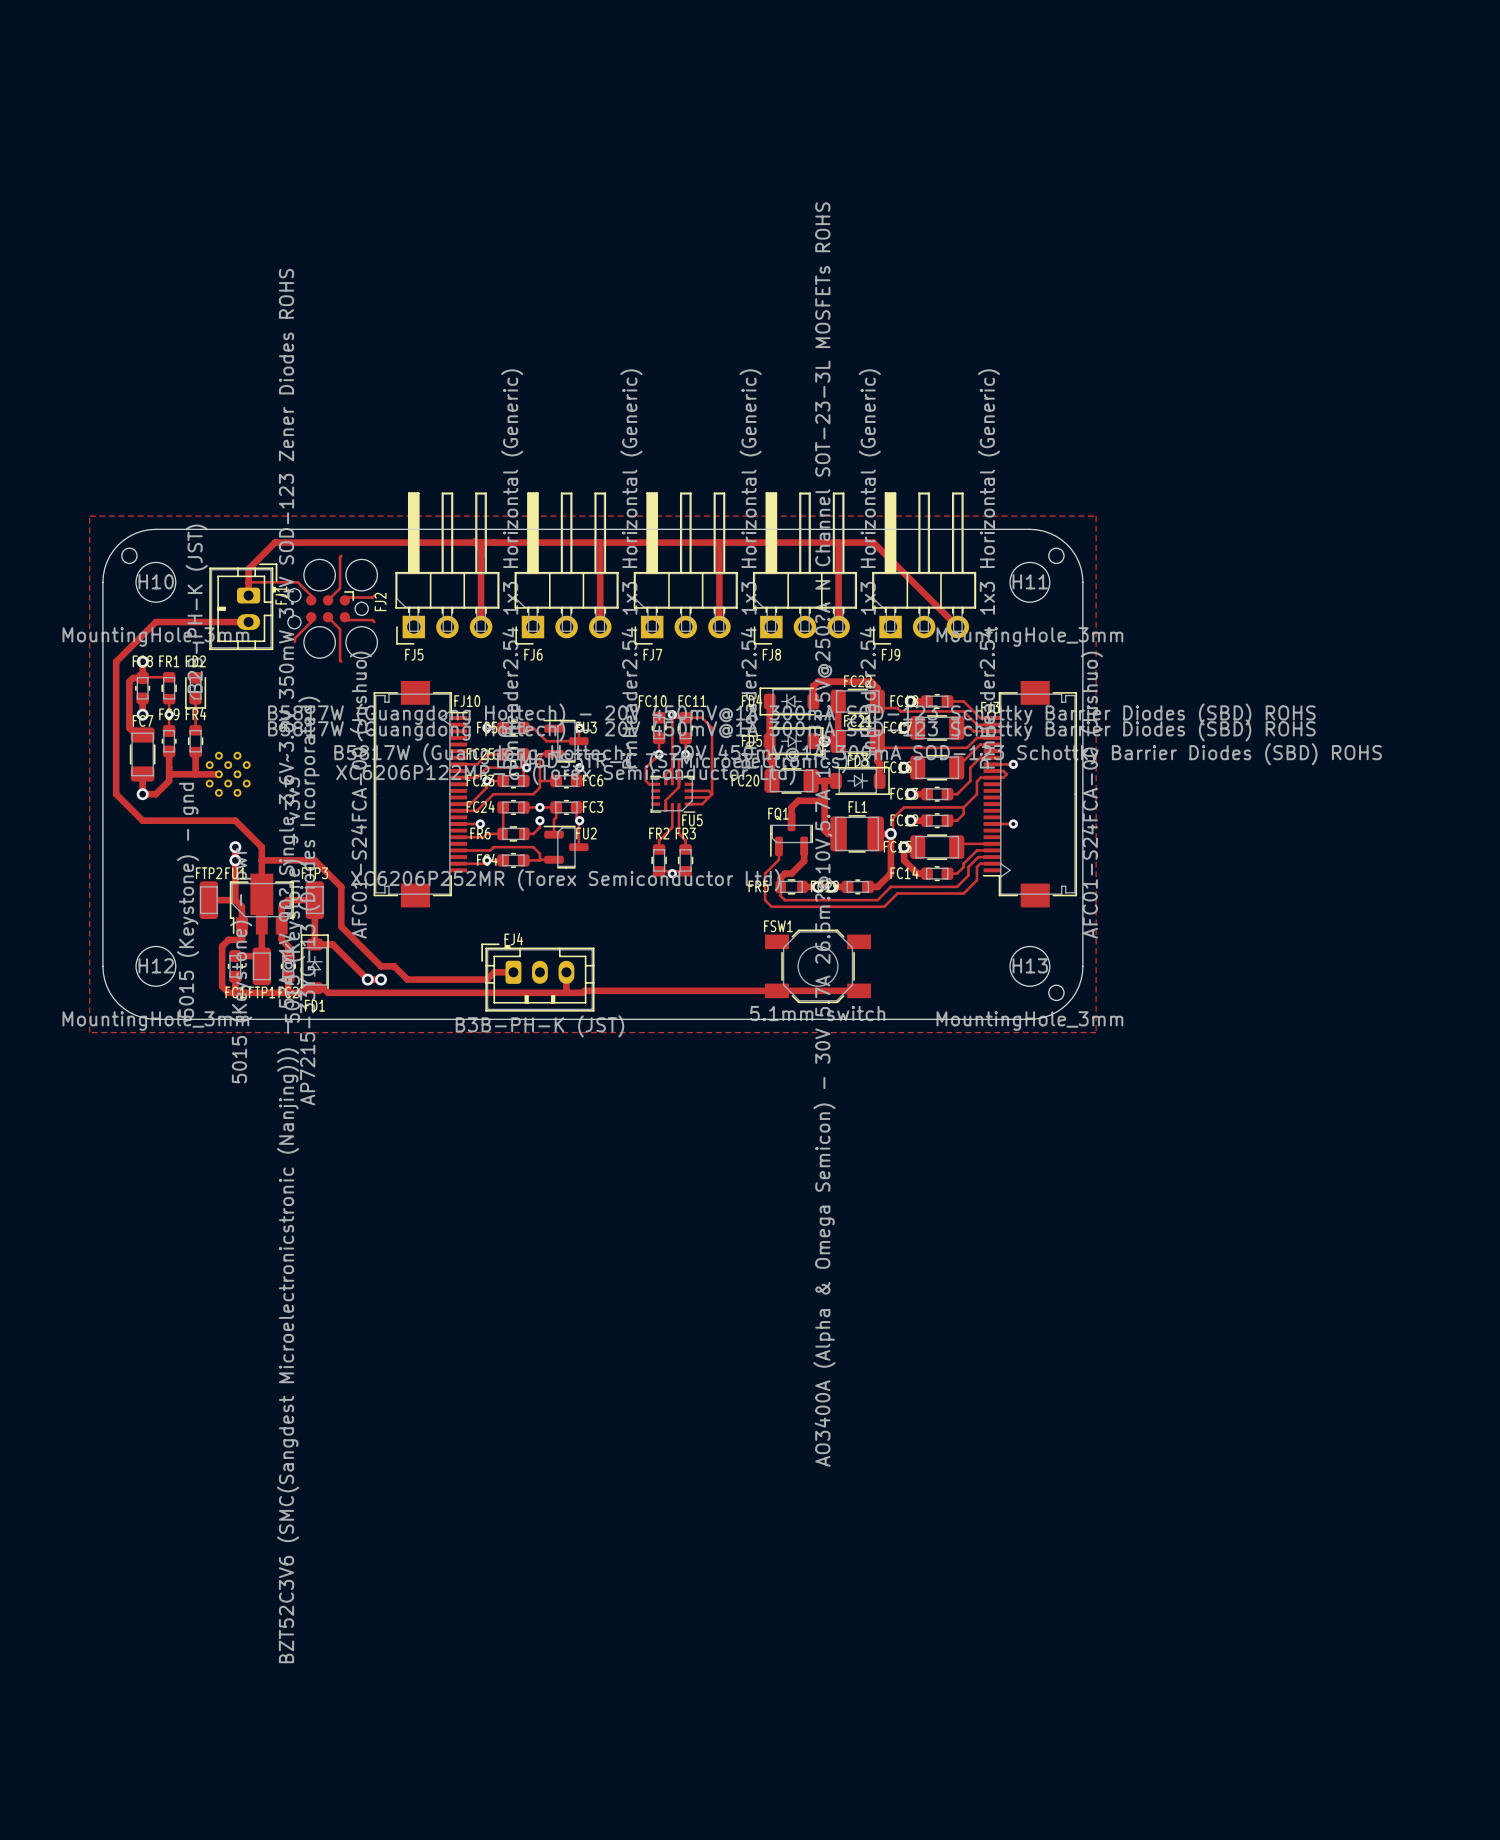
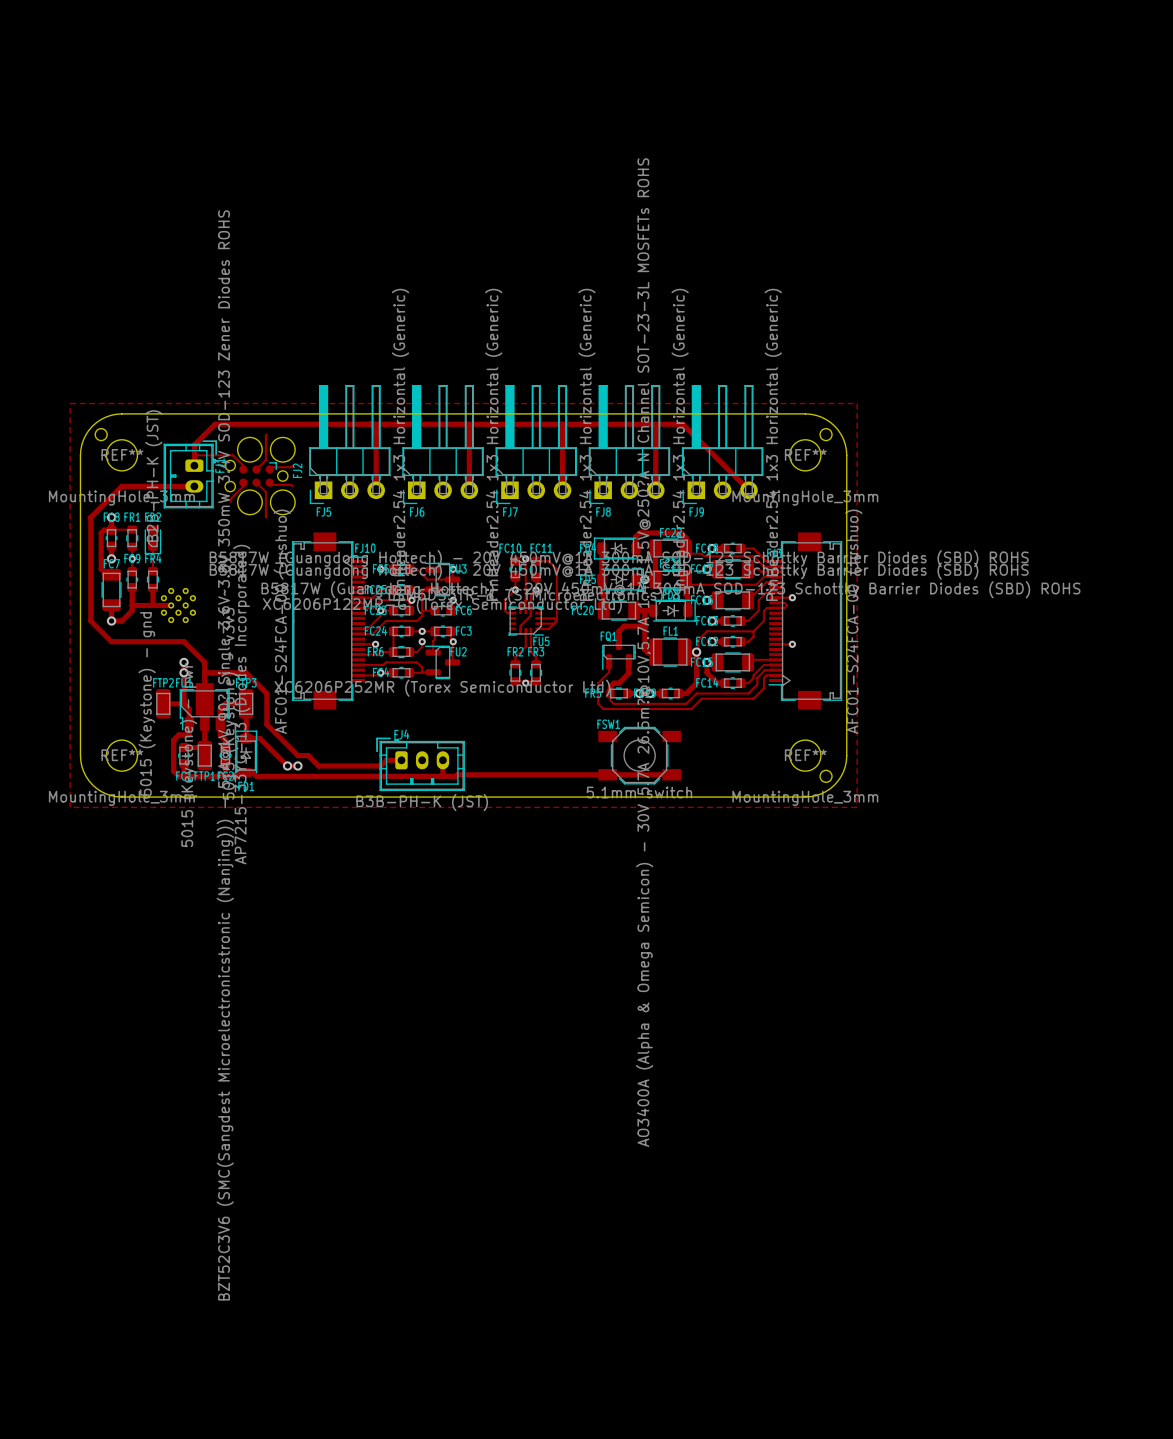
H10 name: H10 (156, 581) -> REF** (122, 454)
H11 name: H11 (1030, 581) -> REF** (805, 454)
H12 name: H12 (156, 965) -> REF** (122, 755)
H13 name: H13 (1030, 965) -> REF** (805, 755)

